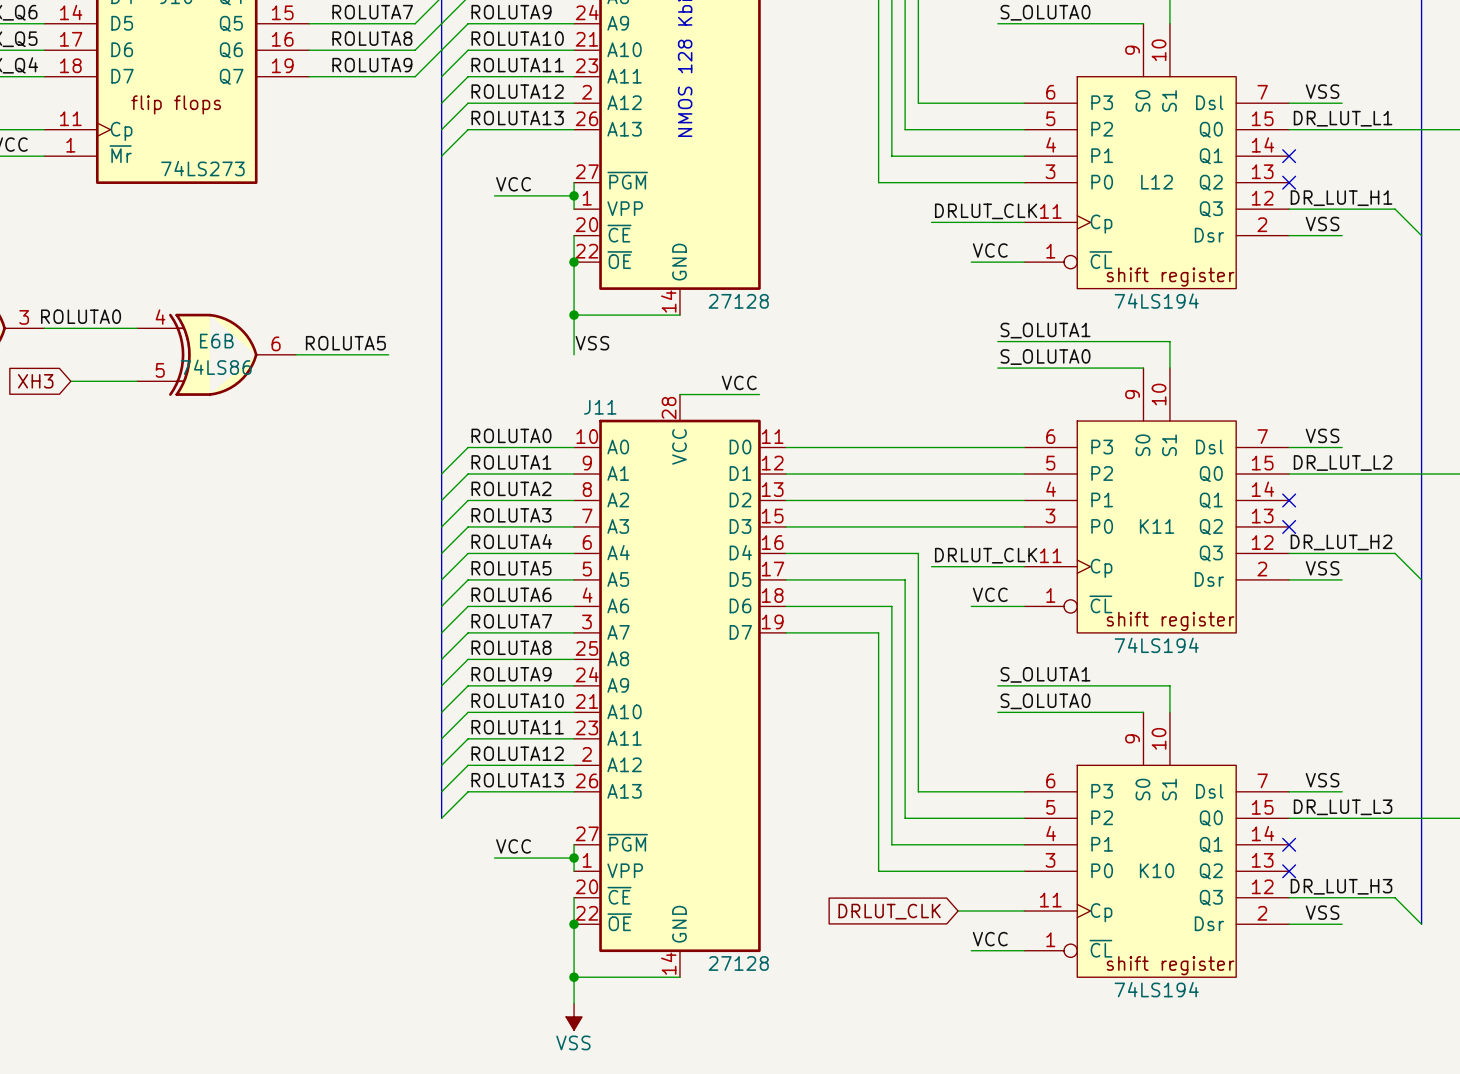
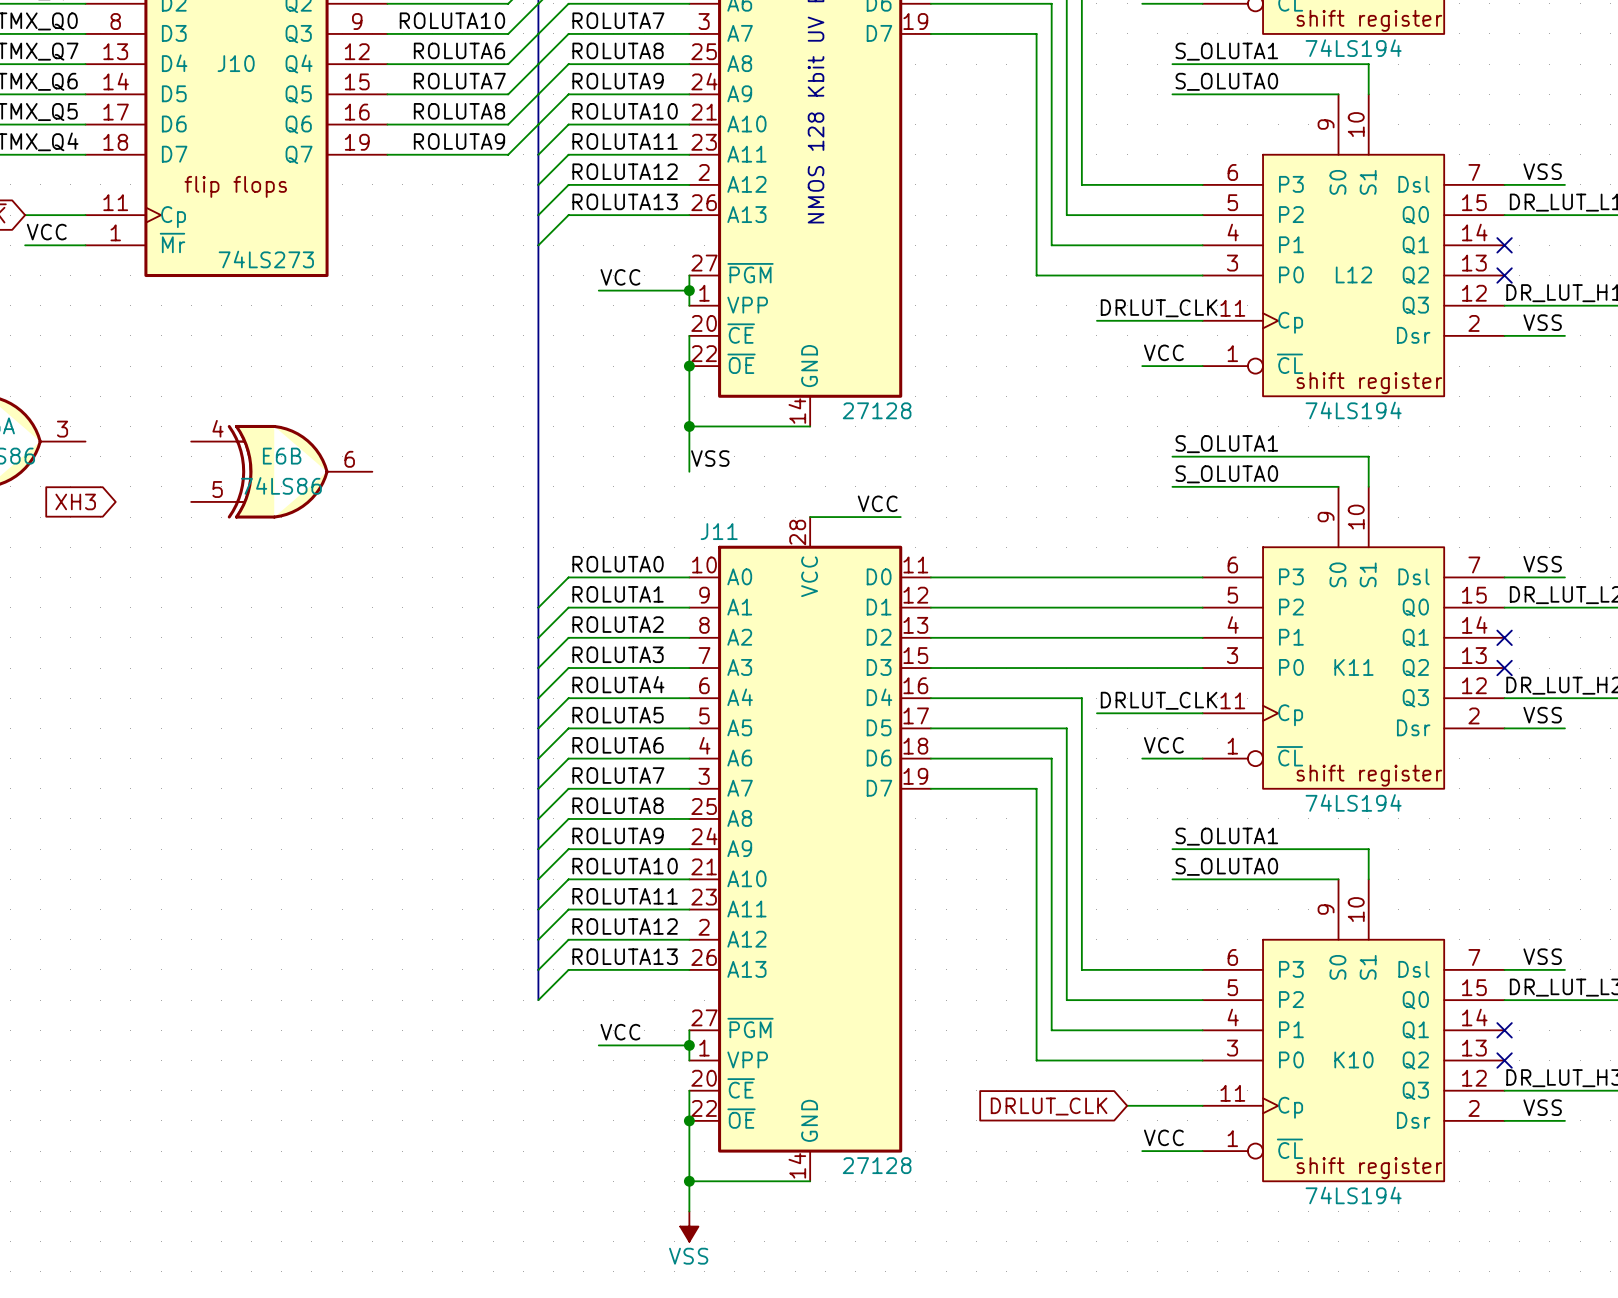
label: ROLUTA0 (81, 316) -> none
wire: (44, 328) (137, 328) -> none
label: ROLUTA5 (345, 343) -> none
wire: (295, 354) (388, 354) -> none
wire: (70, 381) (137, 381) -> none

